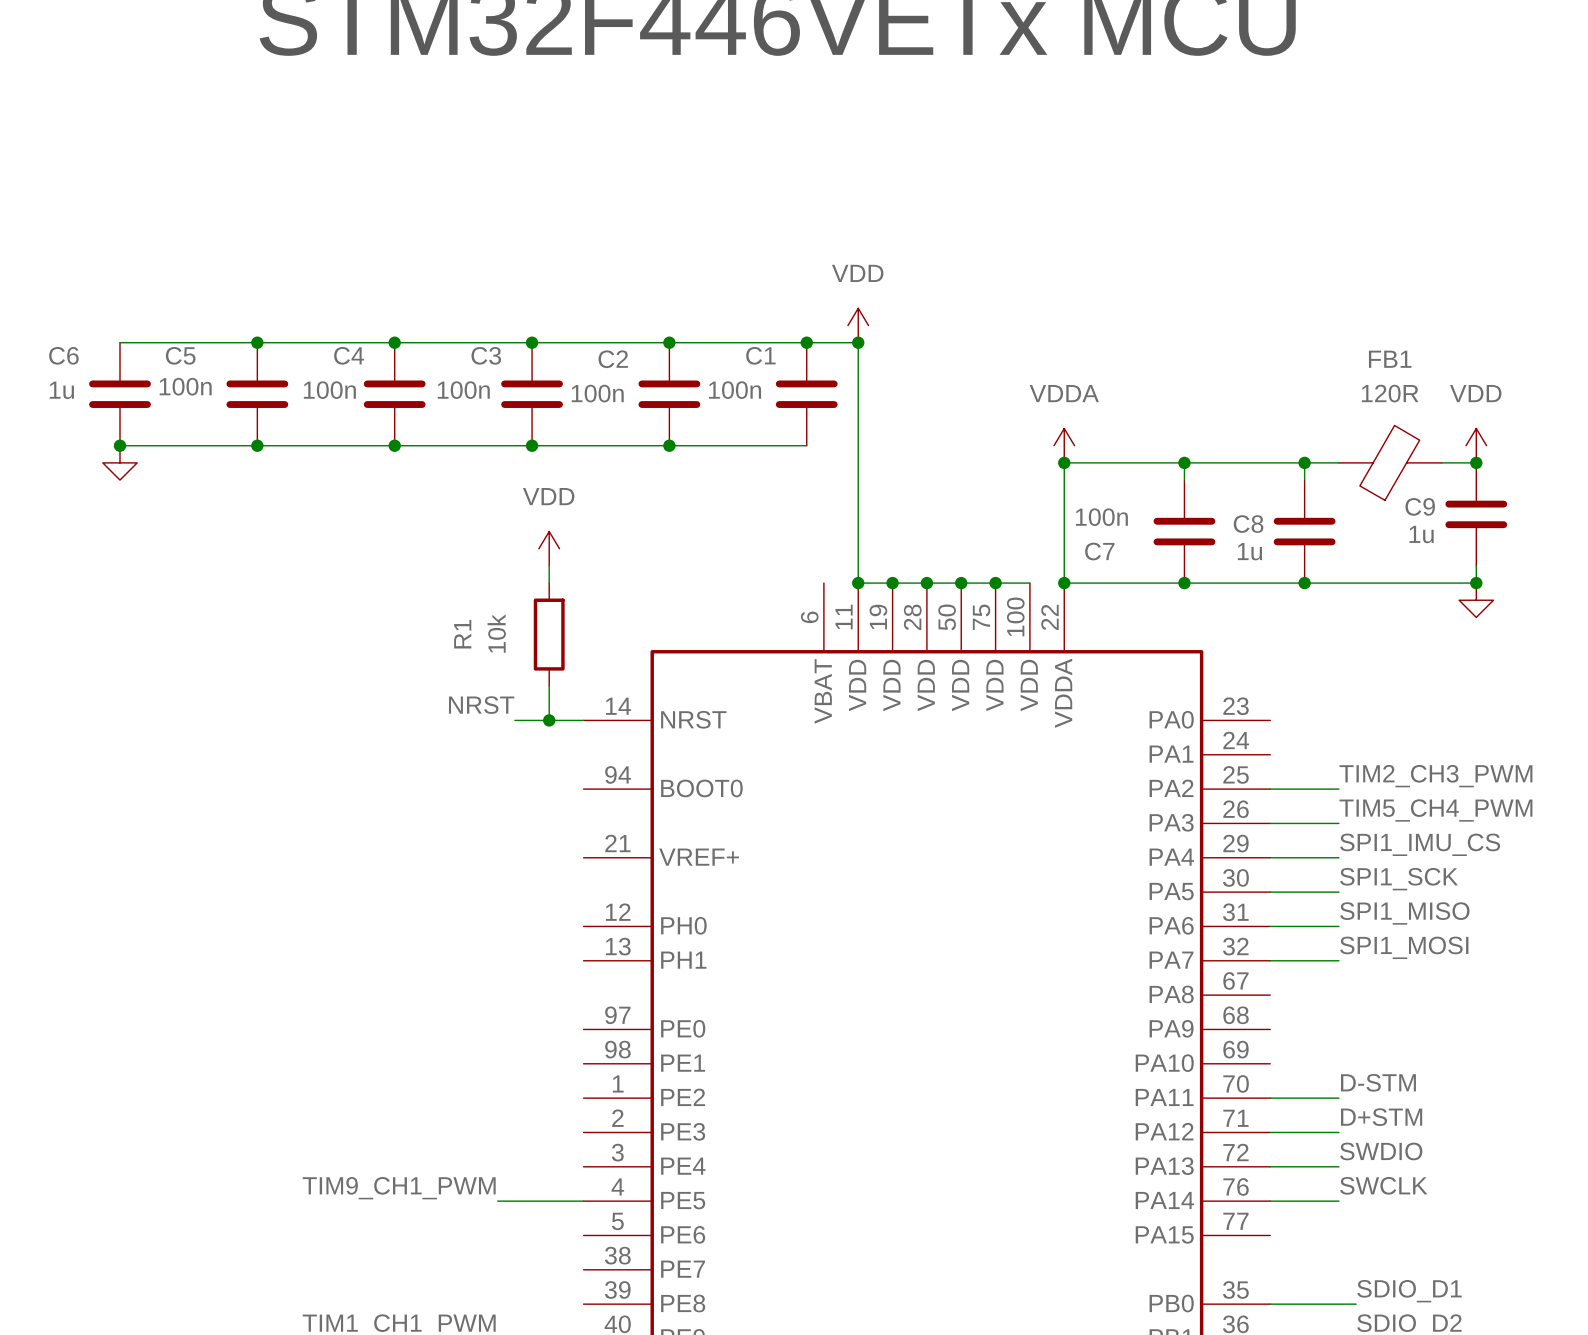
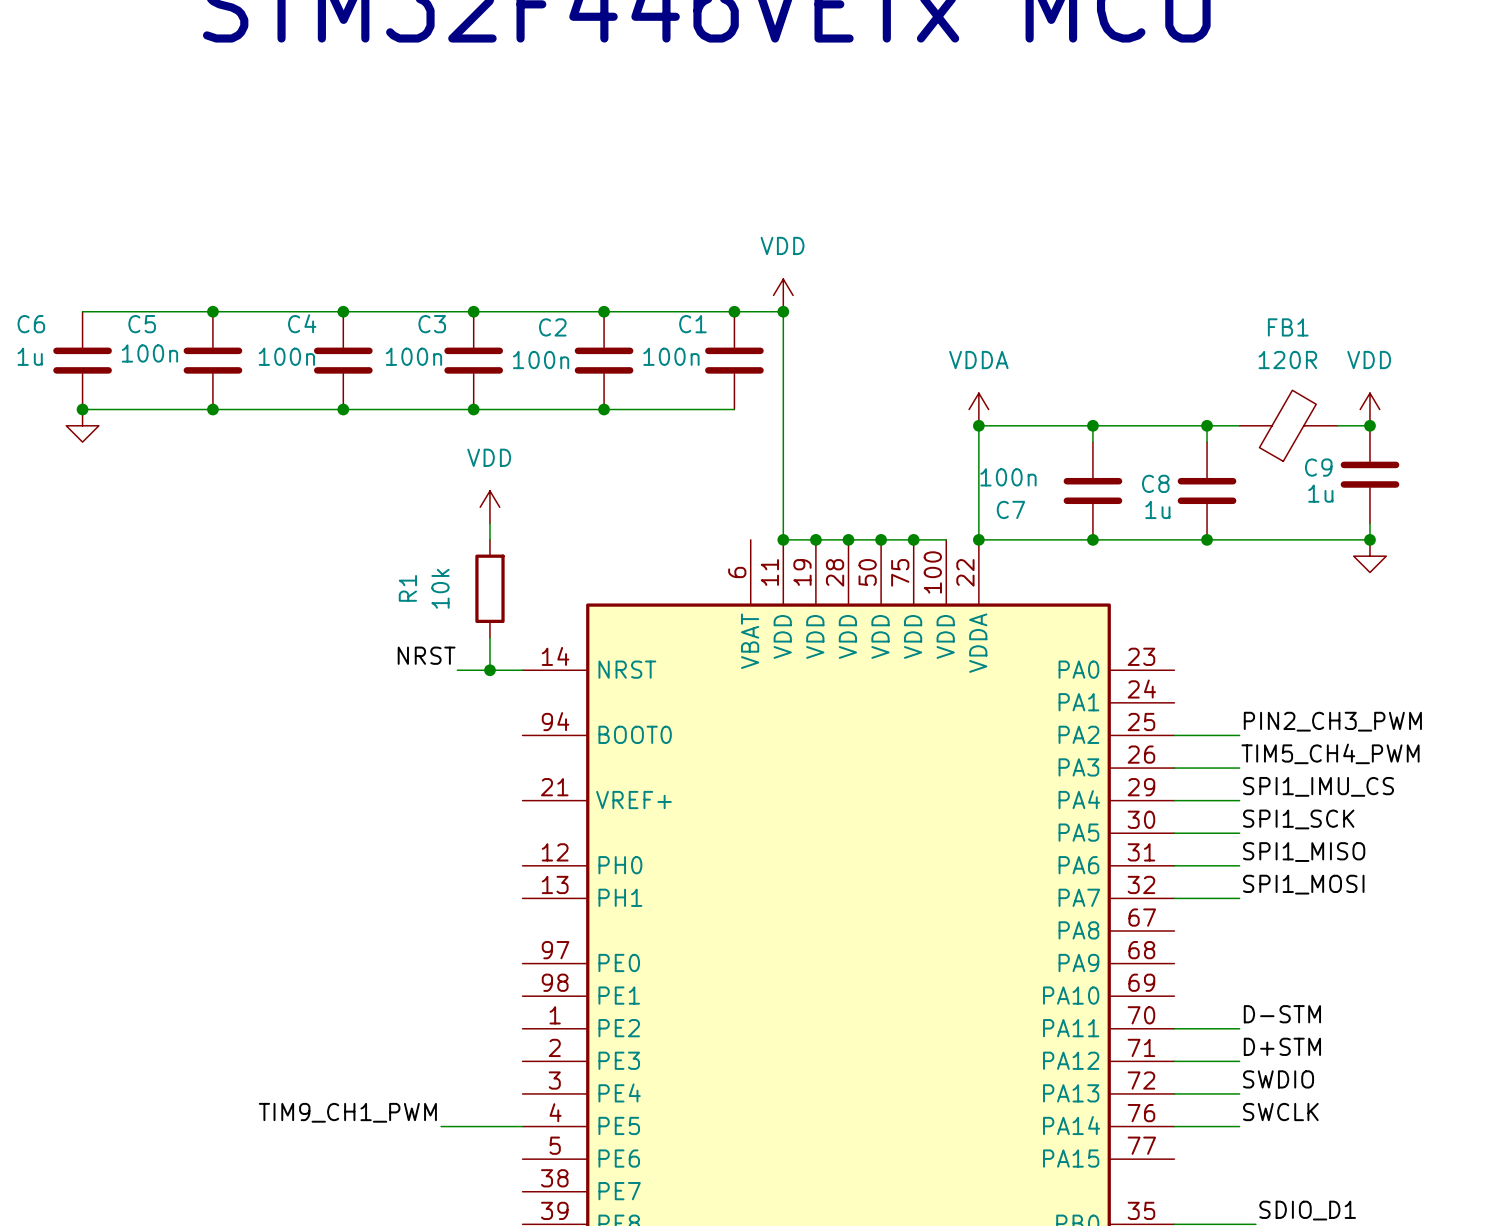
label: TIM2_CH3_PWM (1435, 776) -> PIN2_CH3_PWM (1332, 721)

